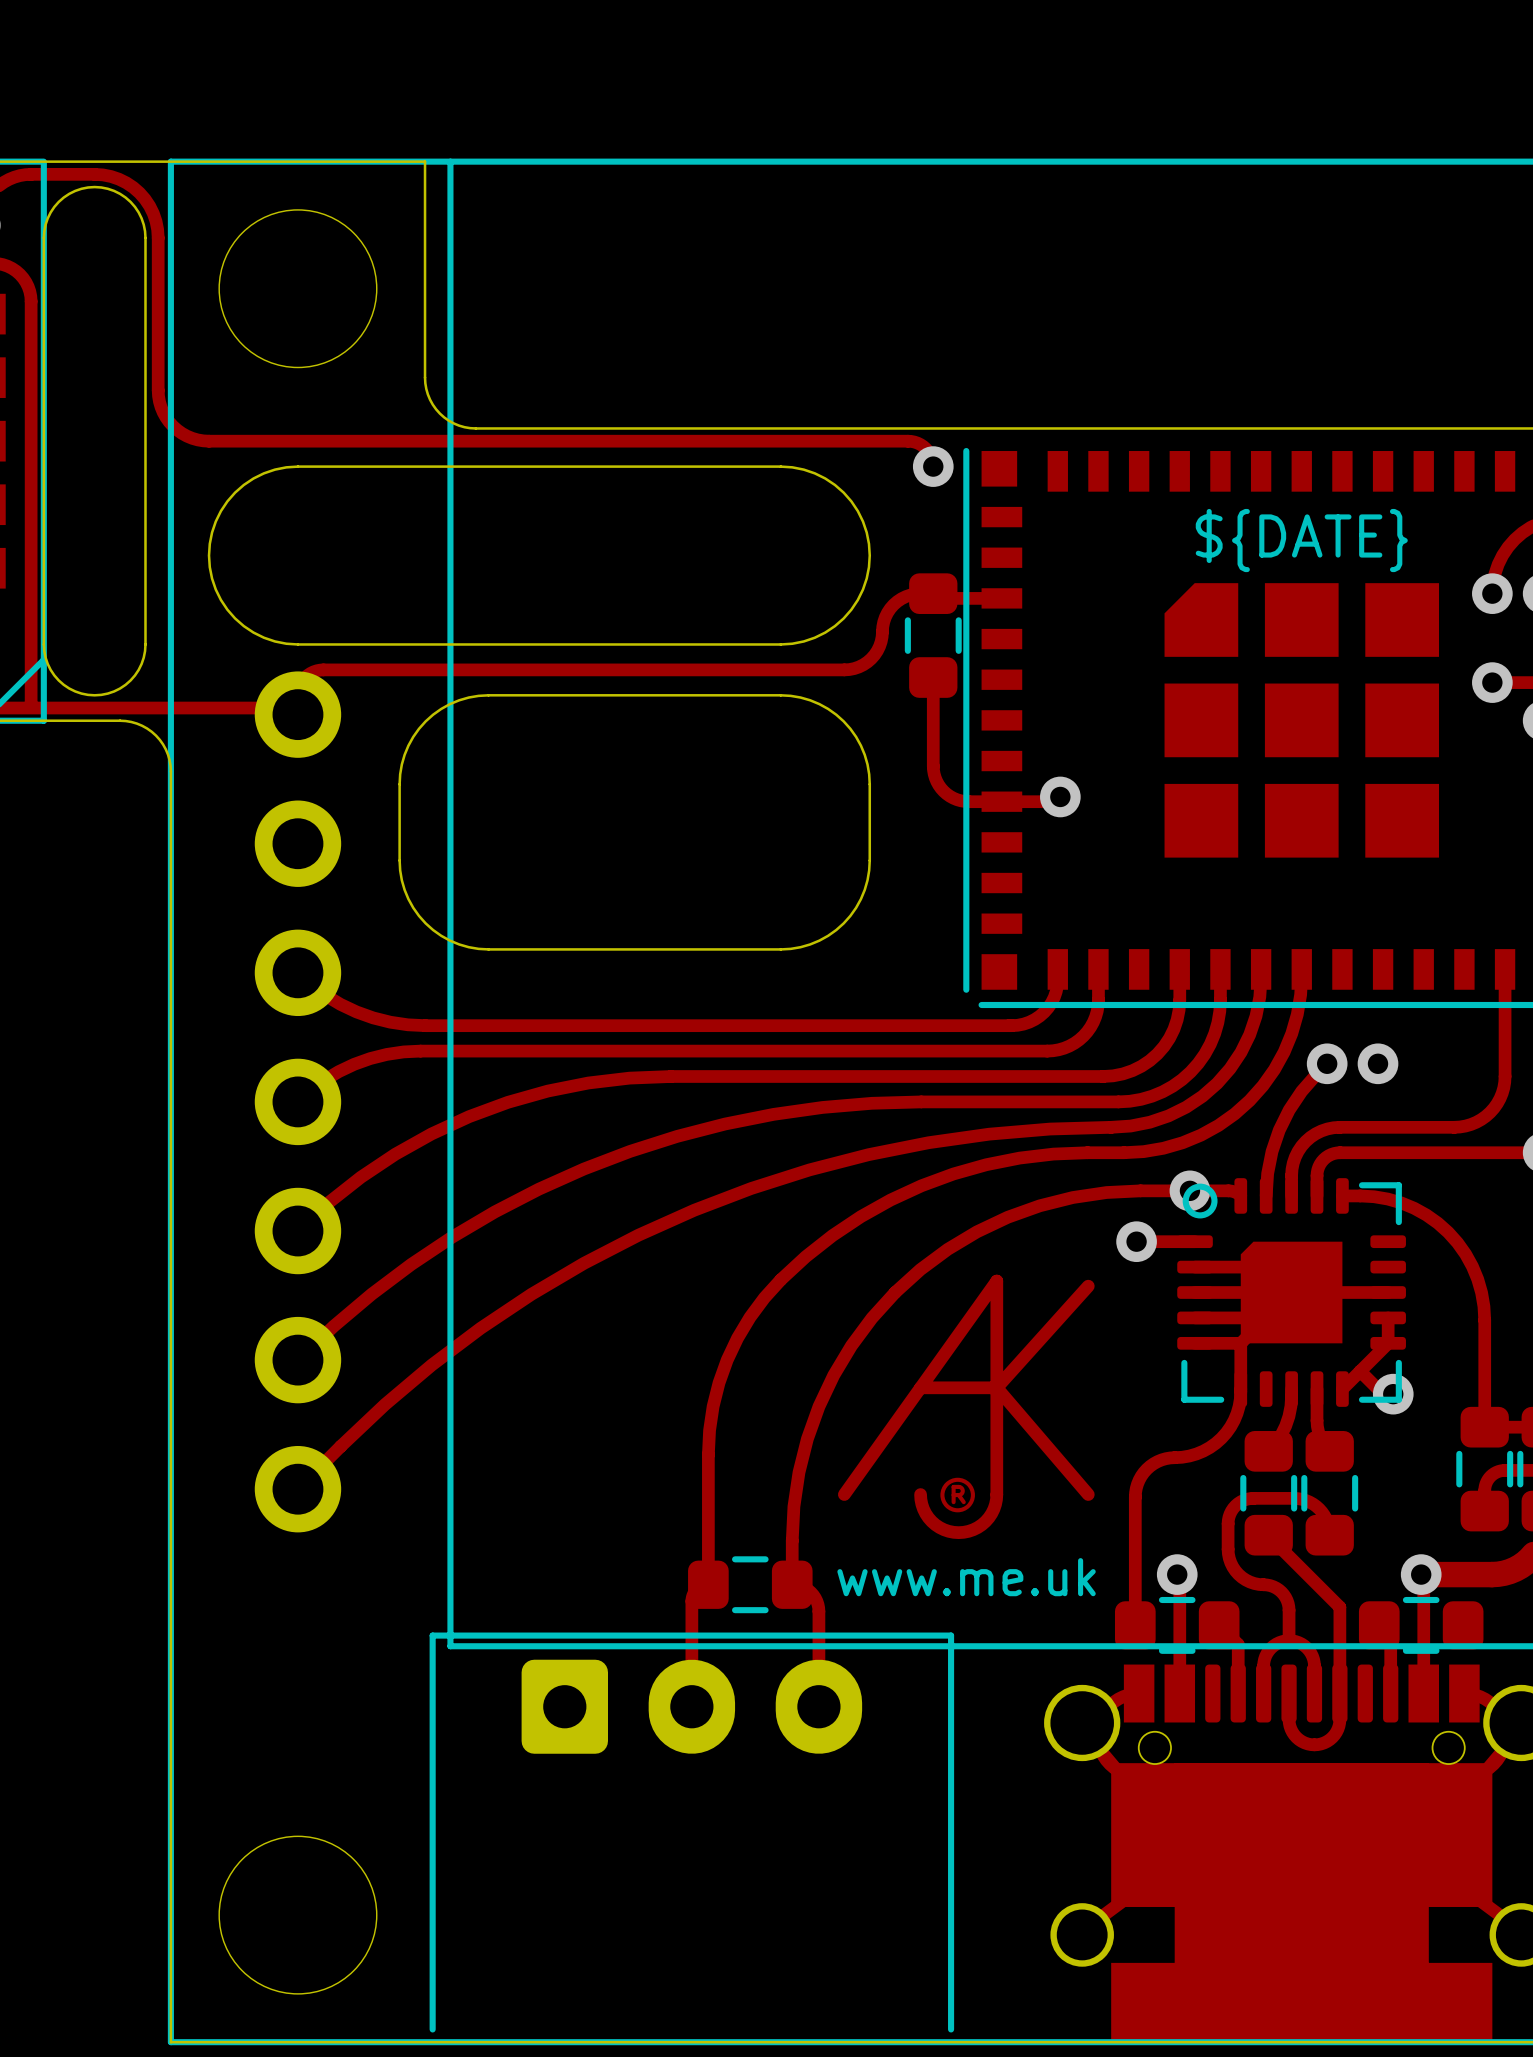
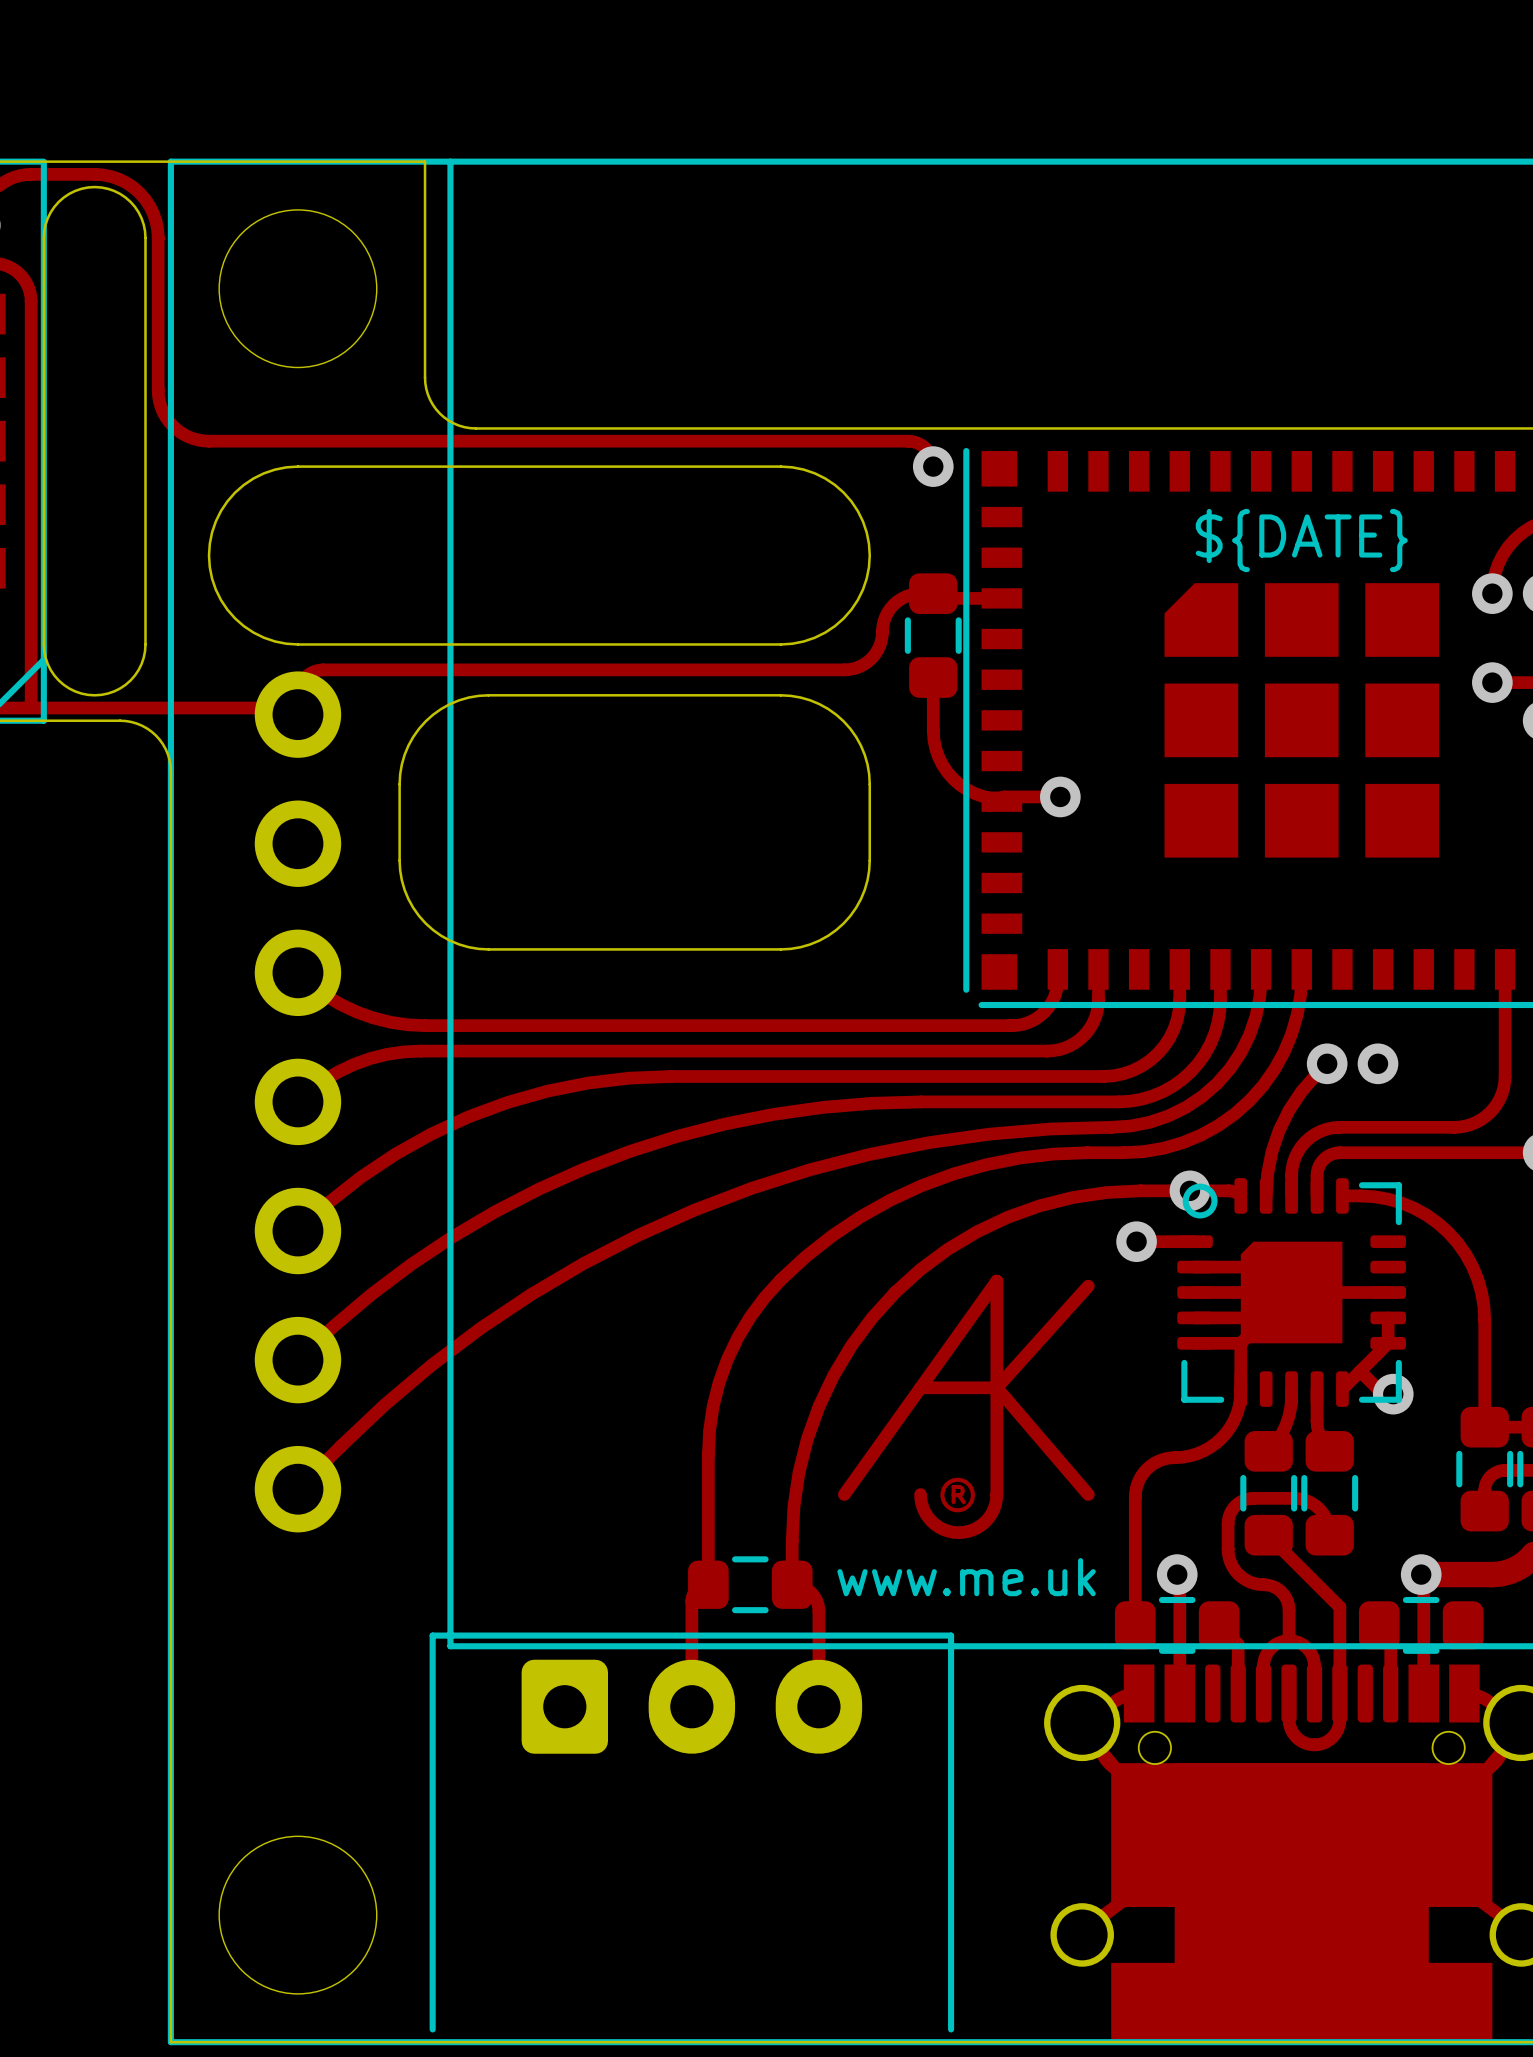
track: (933, 730) (935, 777) (941, 788) (953, 798) (968, 801) (1055, 801) (1060, 796) -> (933, 730) (935, 748) (942, 764) (953, 779) (967, 789) (992, 798) (1060, 796)

